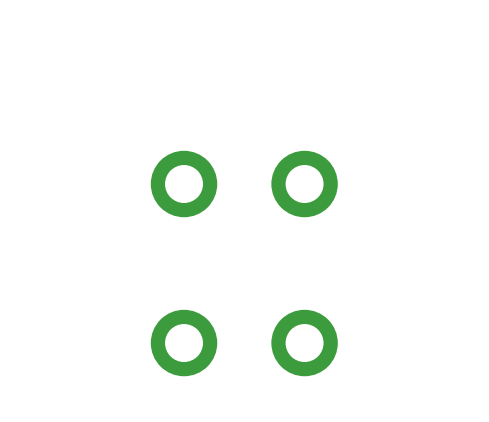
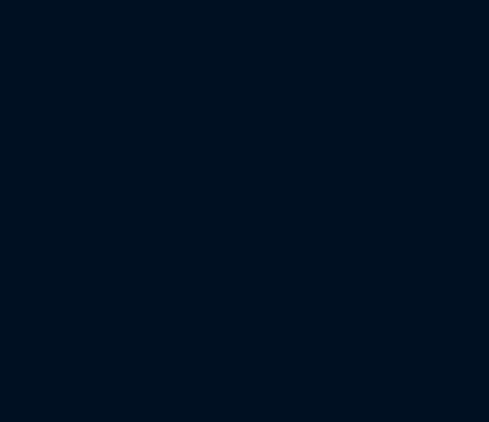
part: (244, 184) -> none
part: (244, 343) -> none

